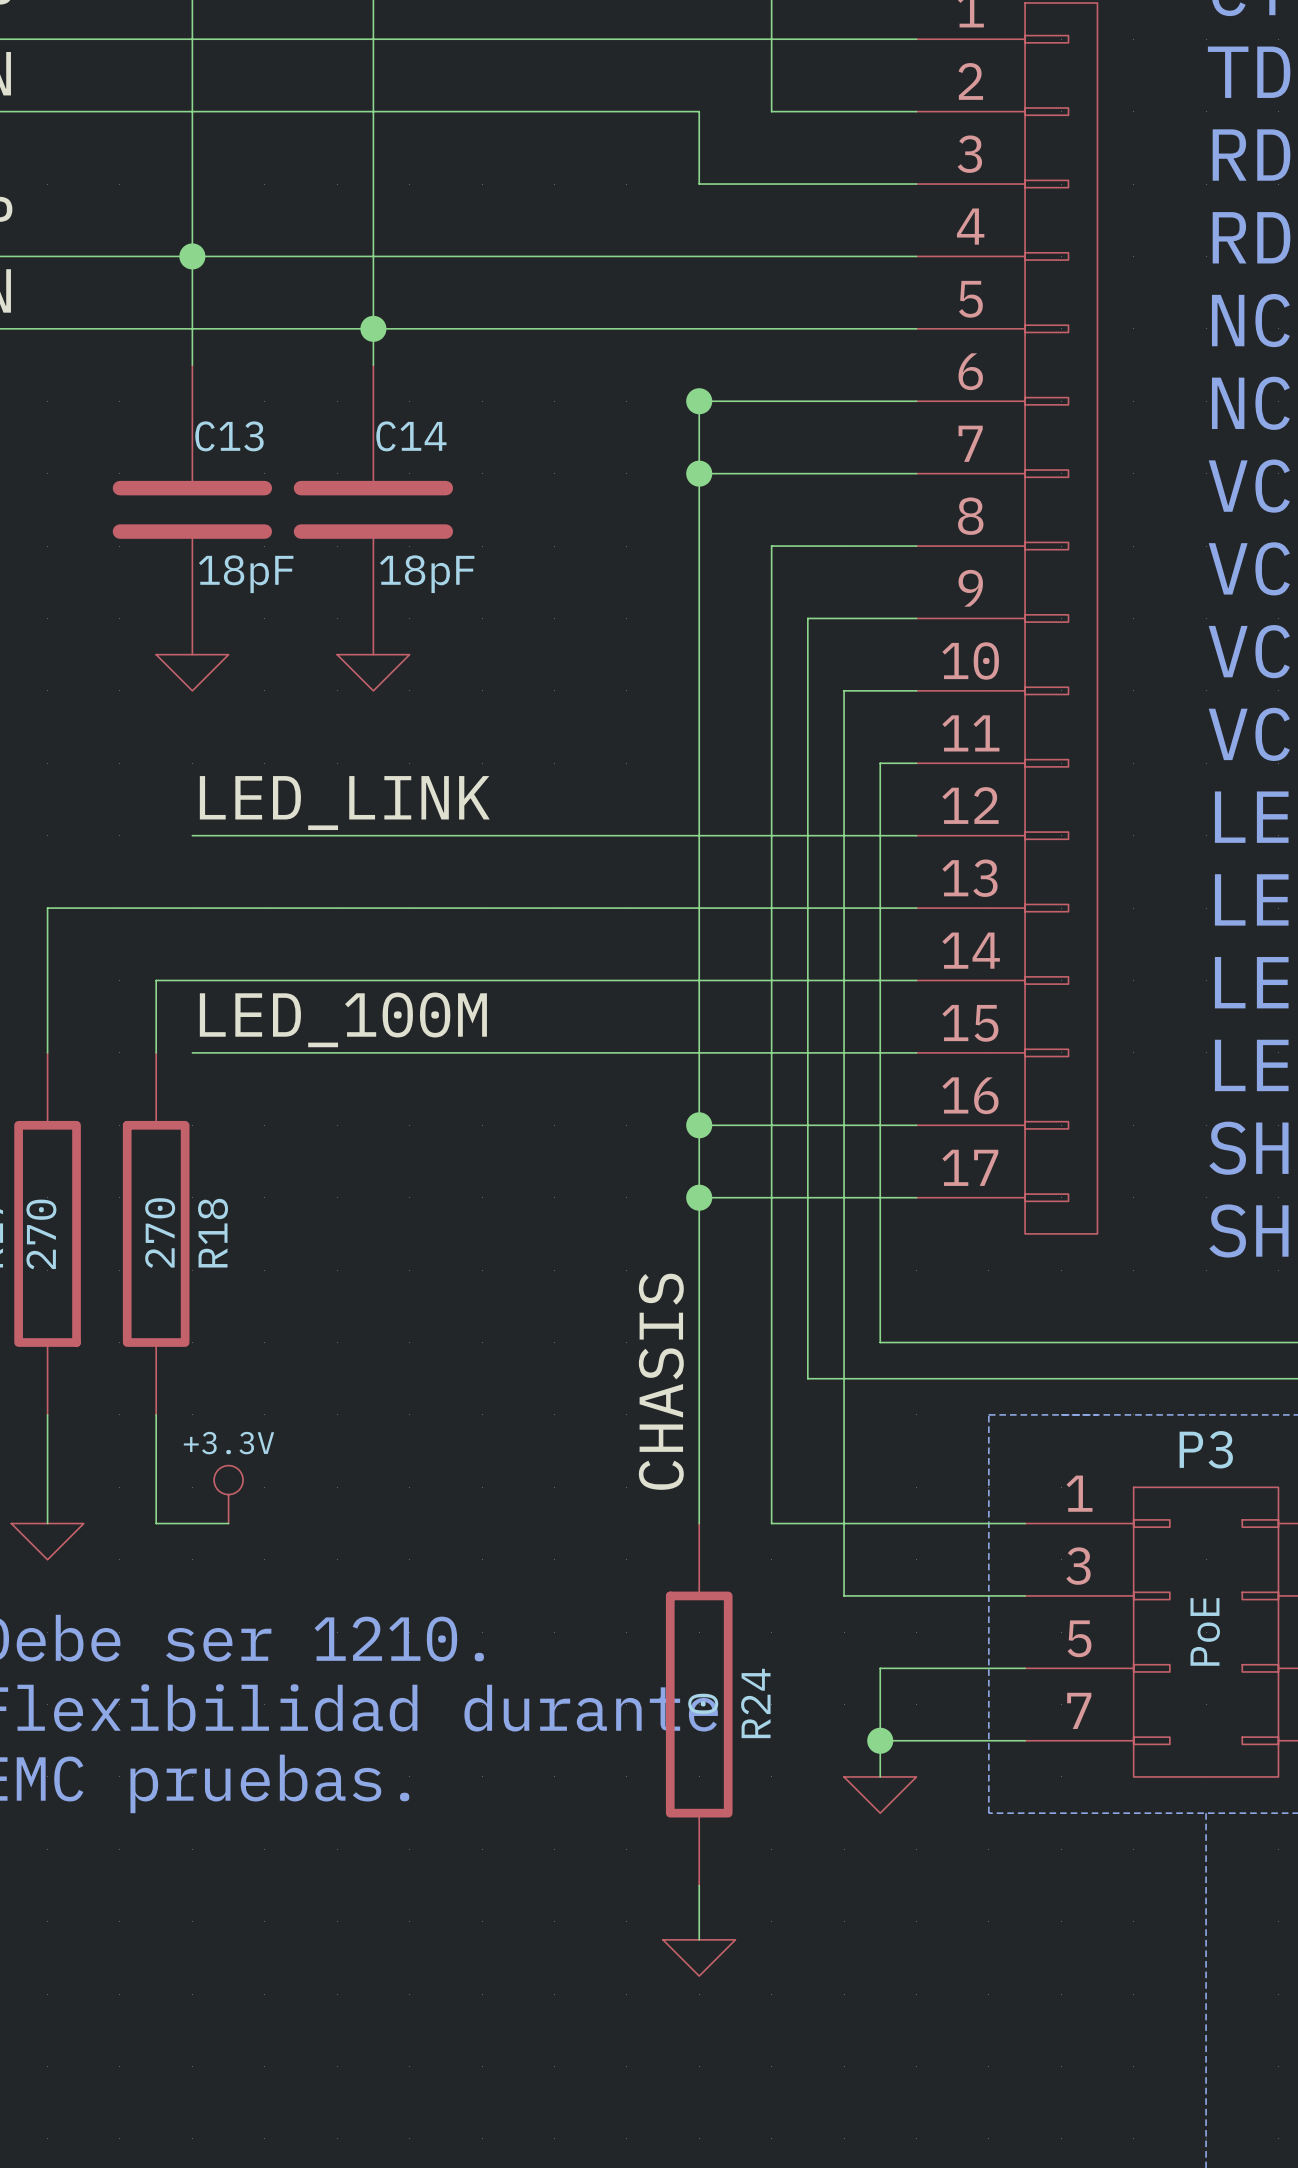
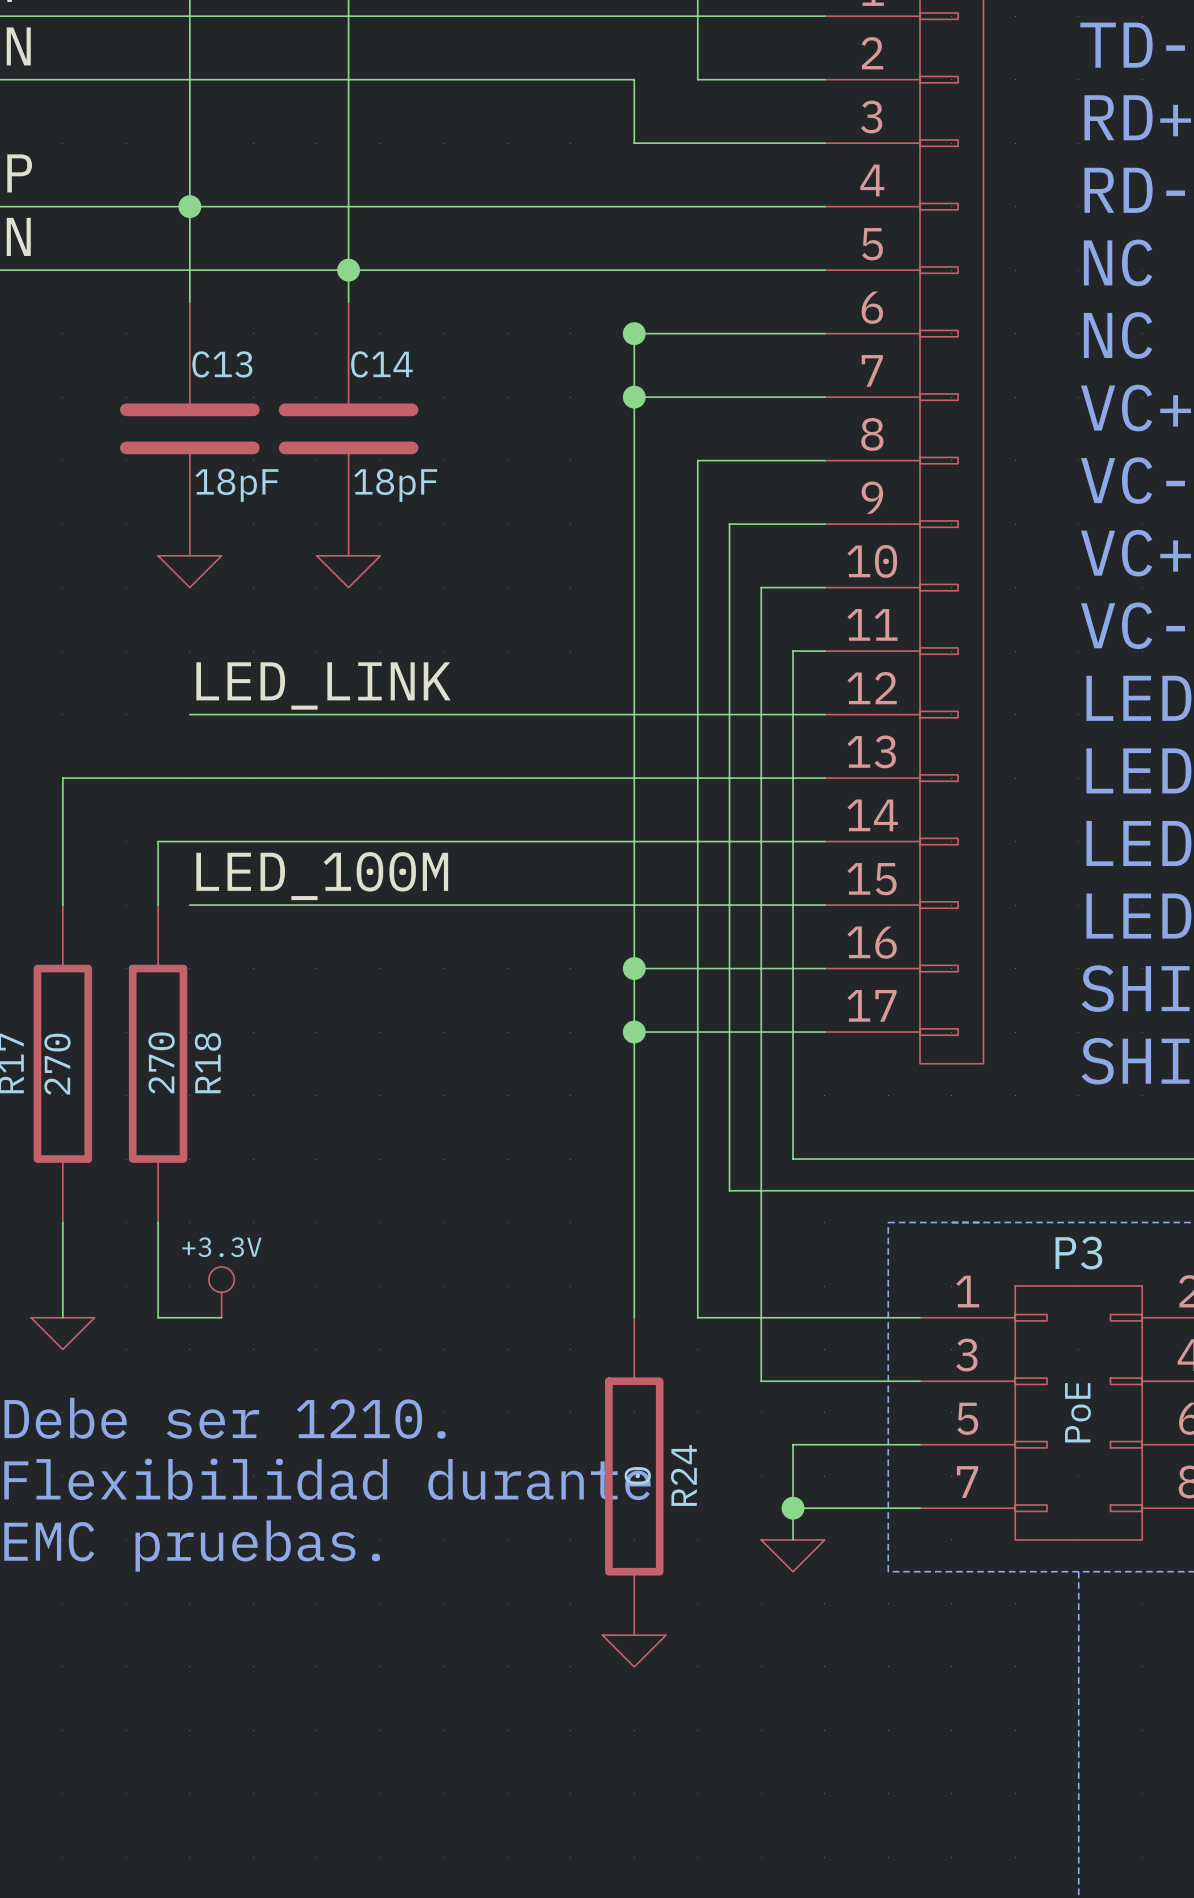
label: CHASIS (661, 1381) -> none
wire: (699, 1885) (699, 1939) -> none
power symbol position: (699, 1957) -> (634, 1651)

